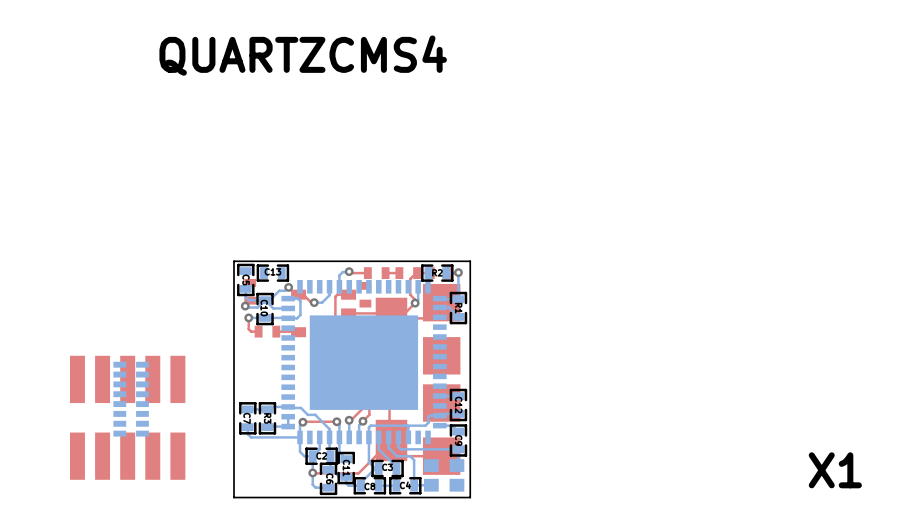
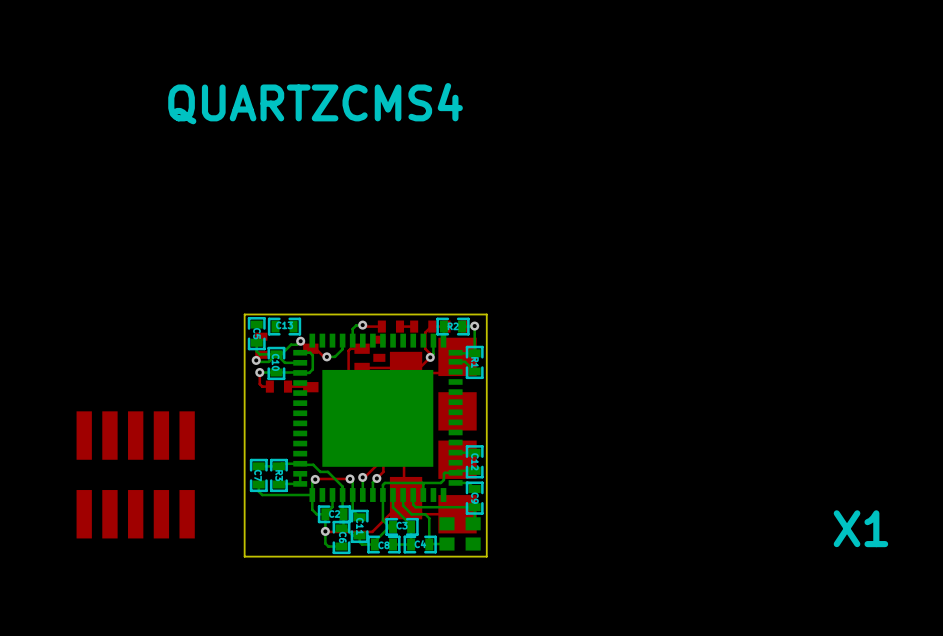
part: (131, 399) -> none

